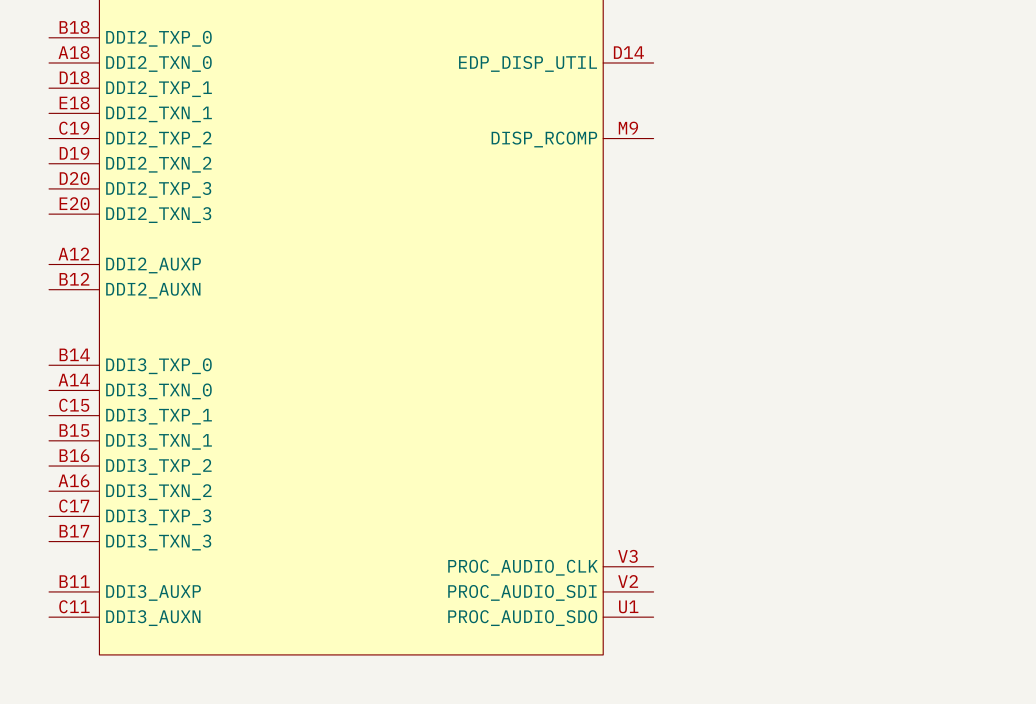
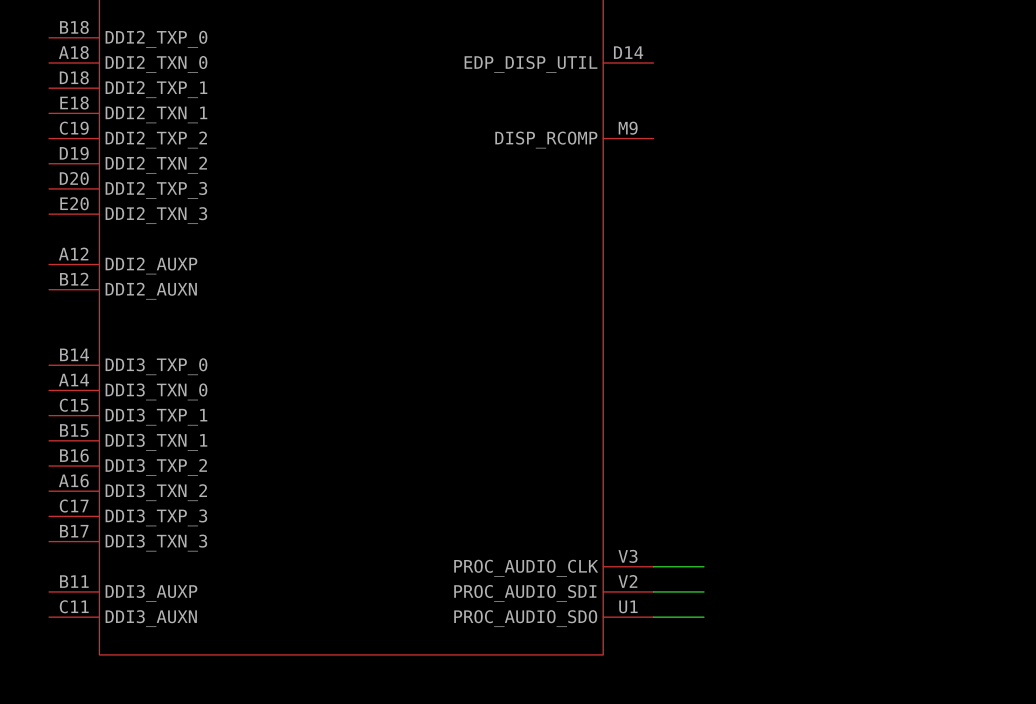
wire: none -> (653, 566) (703, 566)
wire: none -> (653, 591) (703, 591)
wire: none -> (653, 617) (703, 617)

